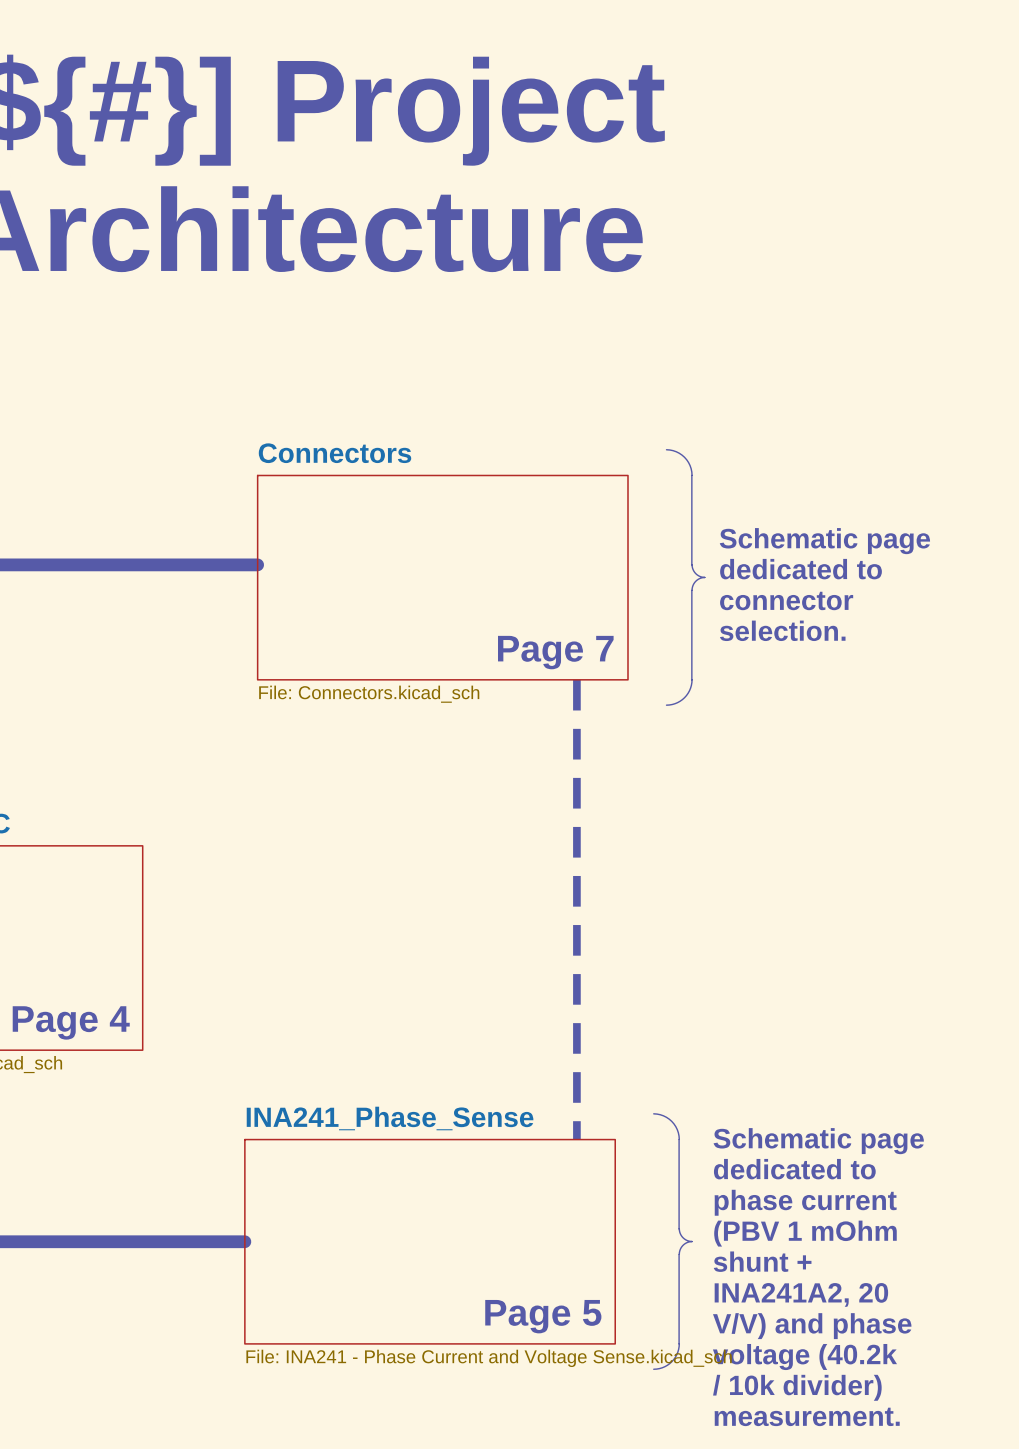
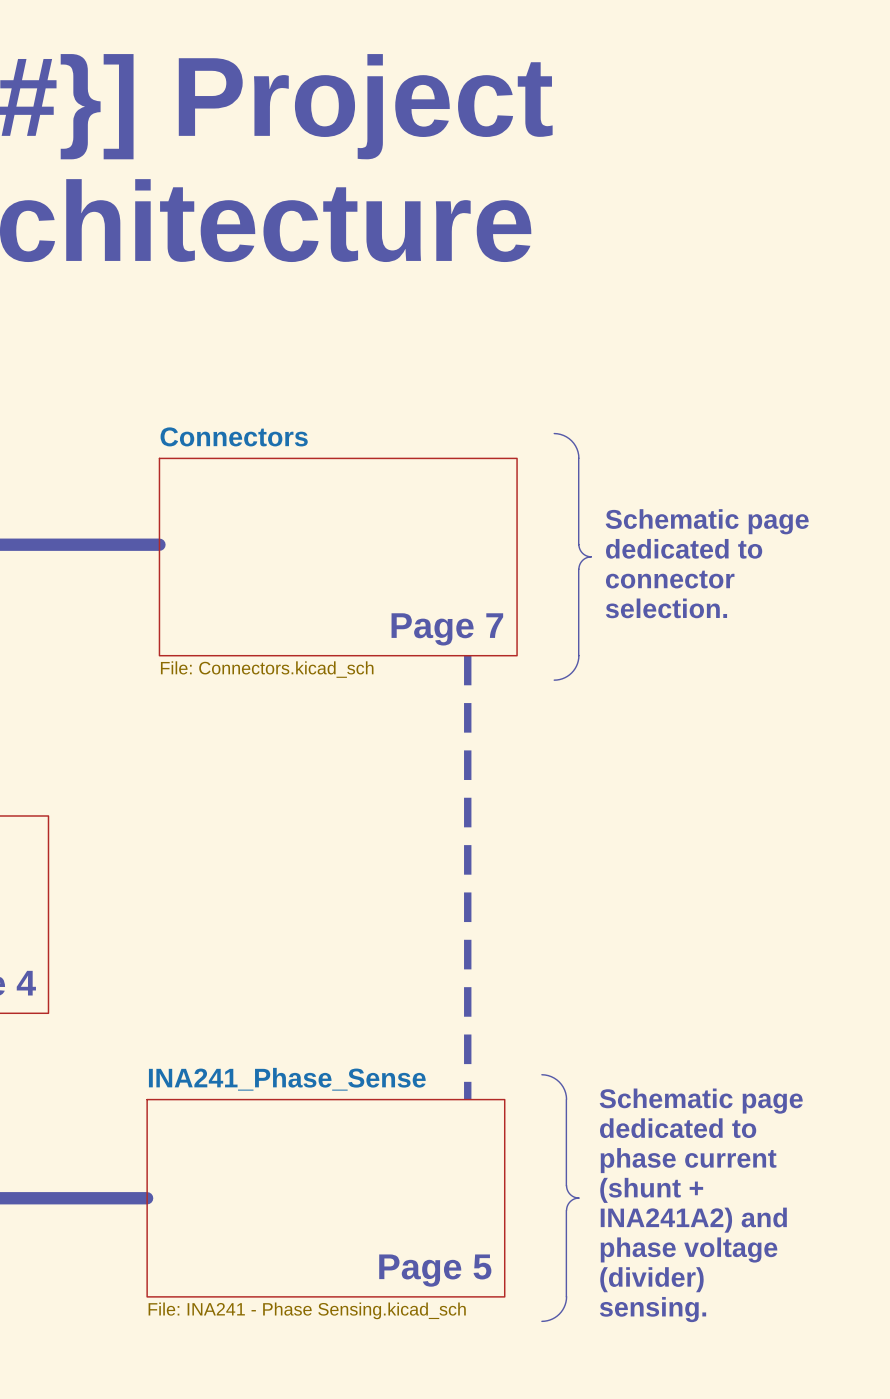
text: (PBV 1 mOhm (805, 1233) -> (shunt + (651, 1190)
text: shunt + (762, 1261) -> INA241A2) and (693, 1220)
text: INA241A2, 20 (801, 1294) -> phase voltage (689, 1249)
text: V/V) and phase (812, 1326) -> (divider) (651, 1279)
text: voltage (40.2k (804, 1357) -> sensing. (653, 1309)
sheet INA241_Phase_Sense value: File: INA241 - Phase Current and Voltage Sense.kicad_sch (489, 1358) -> File: INA241 - Phase Sensing.kicad_sch (307, 1310)
text: / 10k divider) (797, 1387) -> none
text: measurement. (807, 1416) -> none

